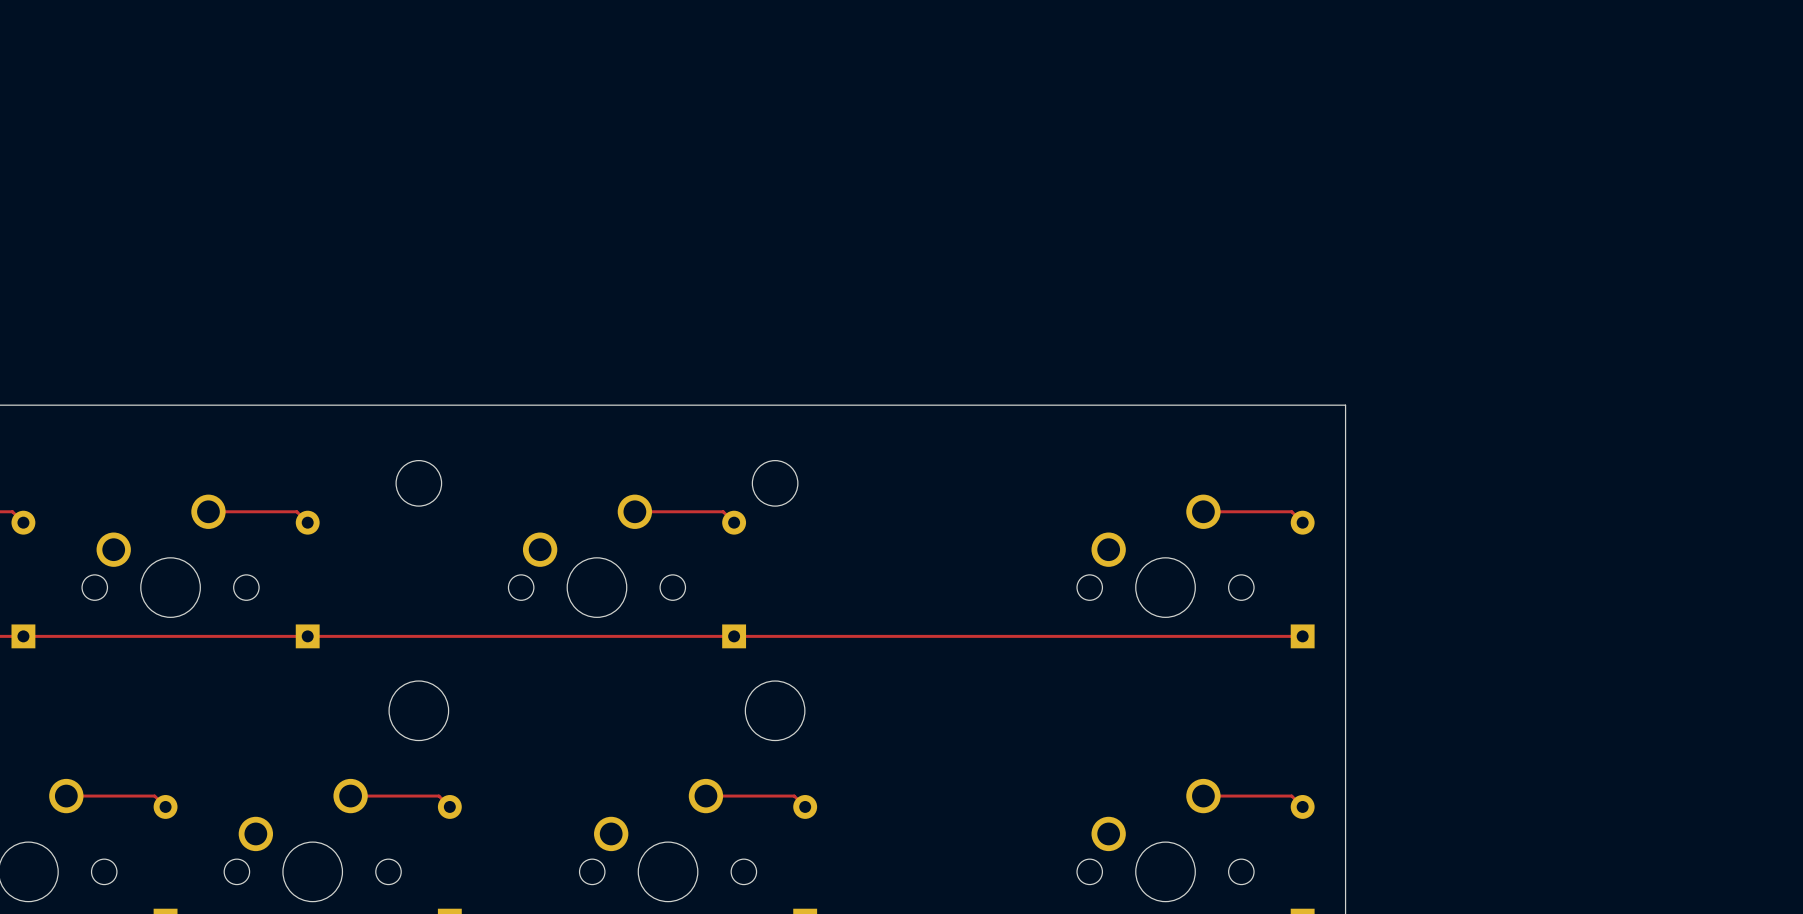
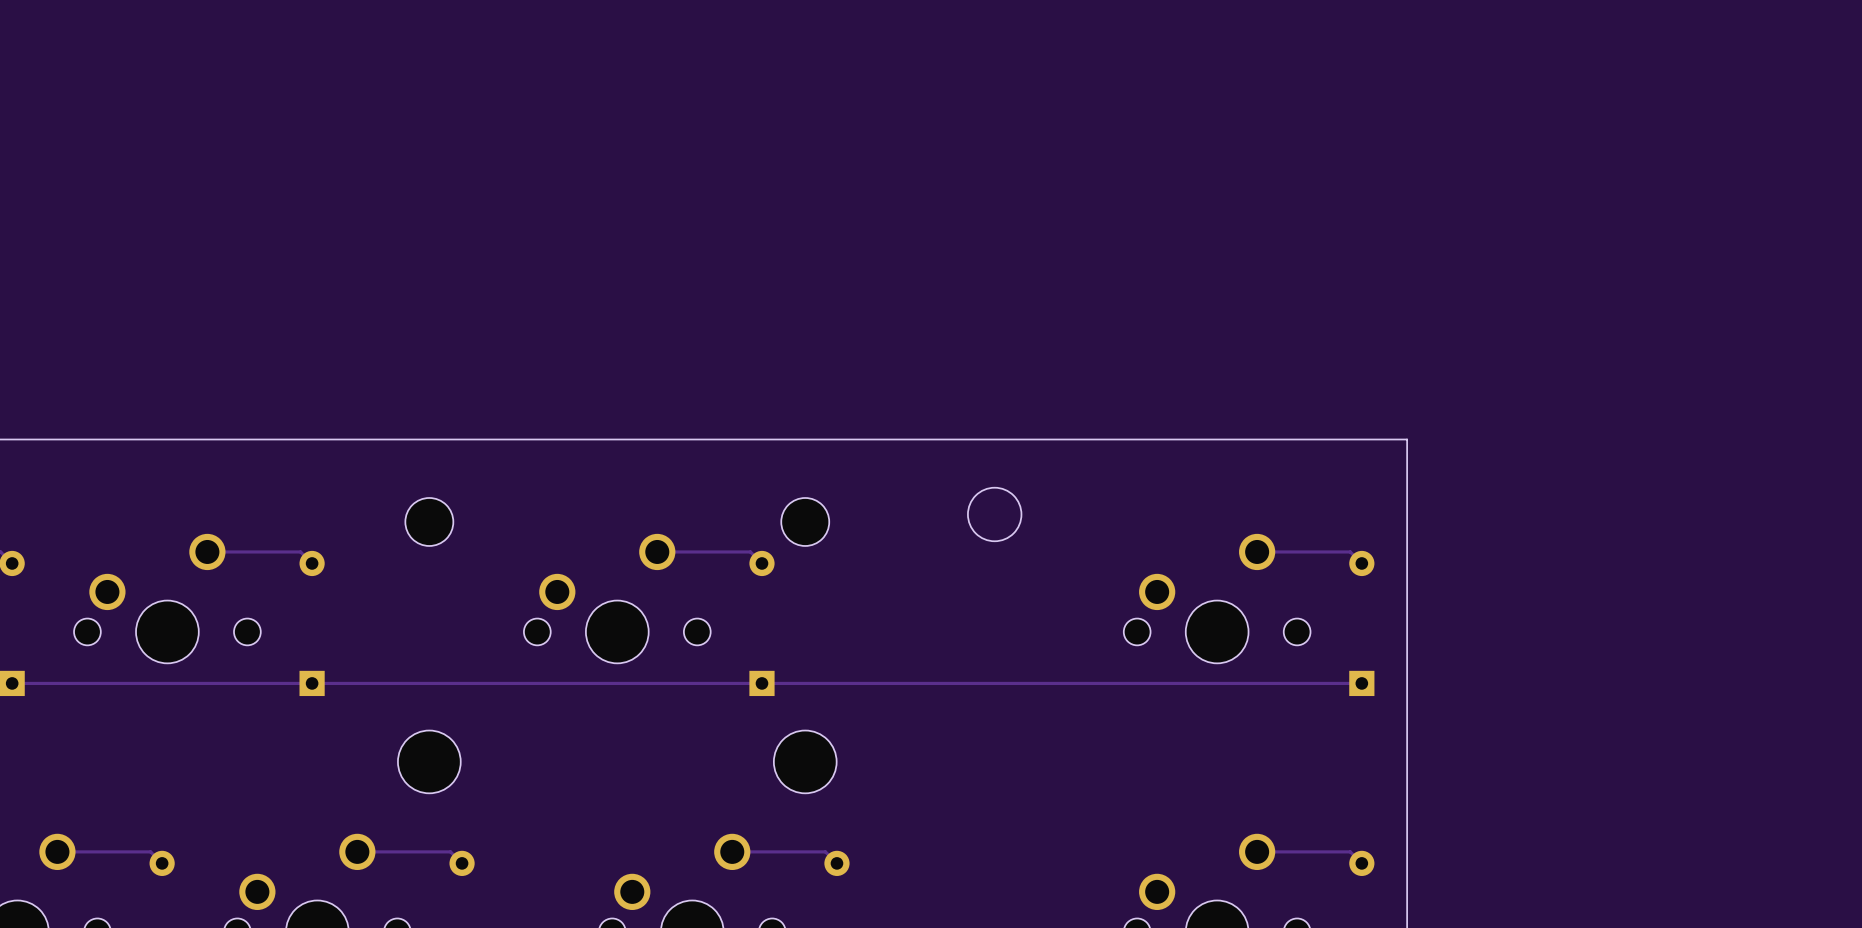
round board edge: none -> [967, 487, 1022, 542]

